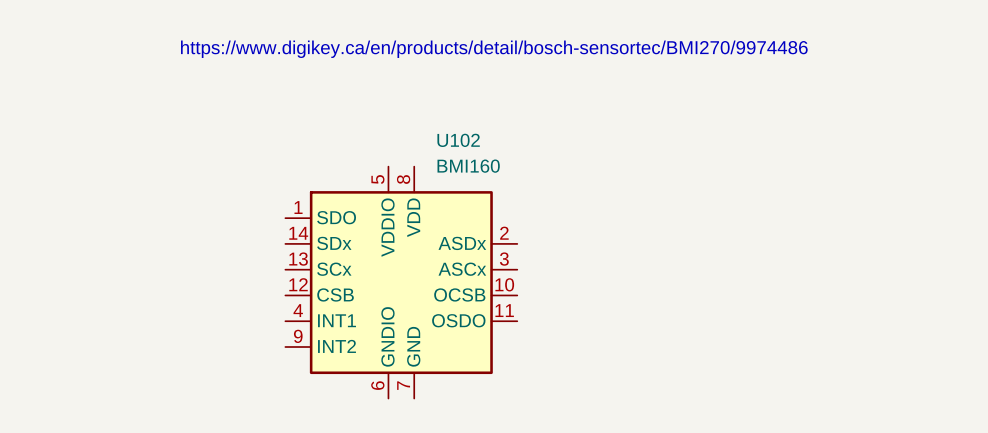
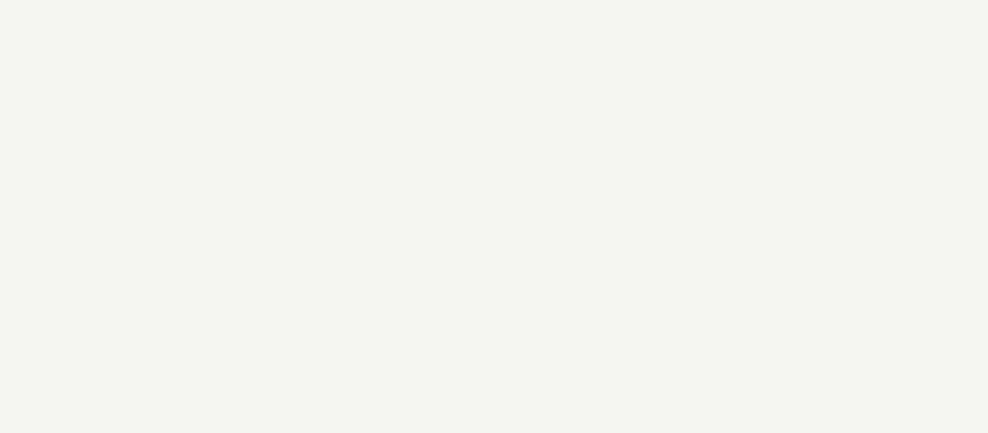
text: https://www.digikey.ca/en/products/detail/bosch-sensortec/BMI270/9974486 (494, 49) -> none
U102: BMI160 (401, 282) -> none

